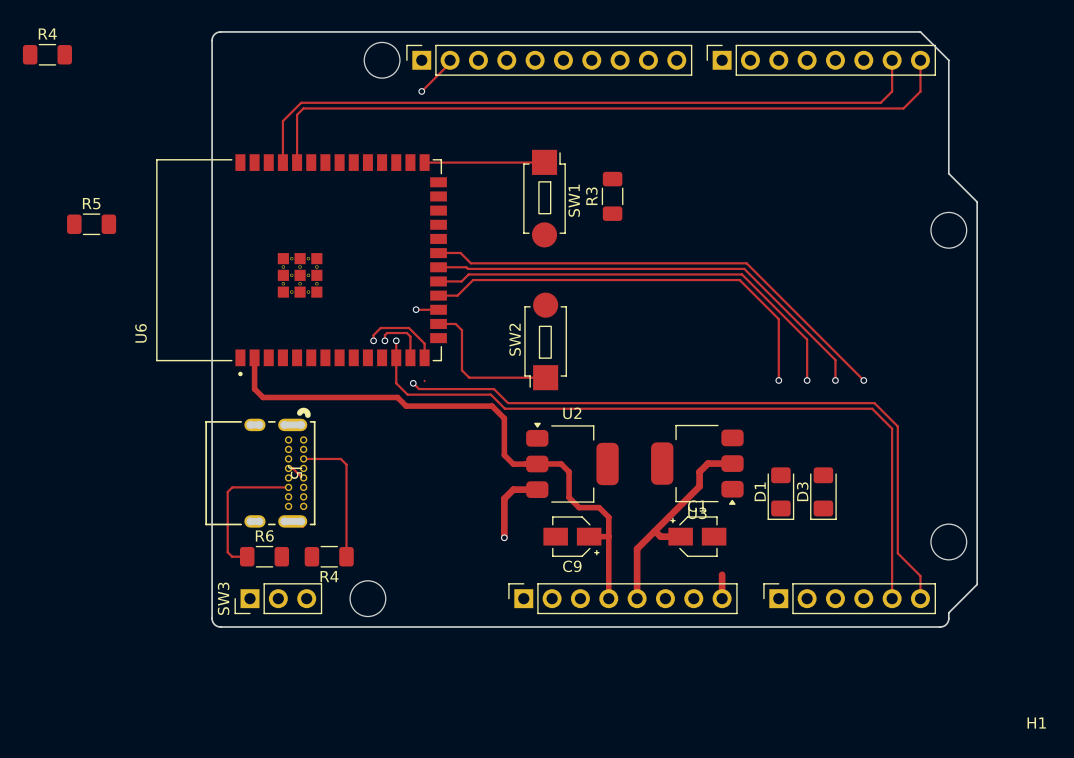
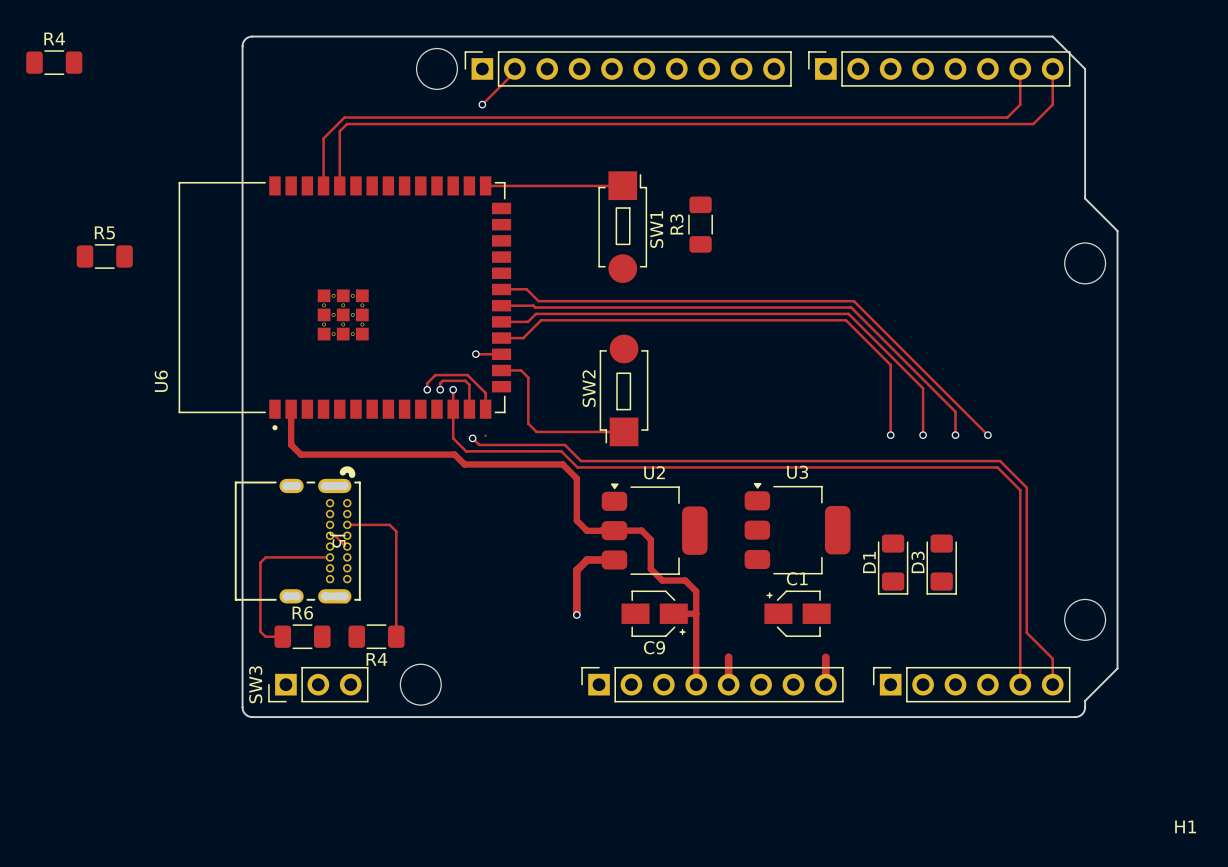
track: (732, 463) (707, 463) (699, 471) (699, 486) (637, 548) (637, 574) -> none
U3 rotation: 0° (697, 464) -> 180° (797, 528)
track: (654, 531) (660, 536) (680, 536) -> none

